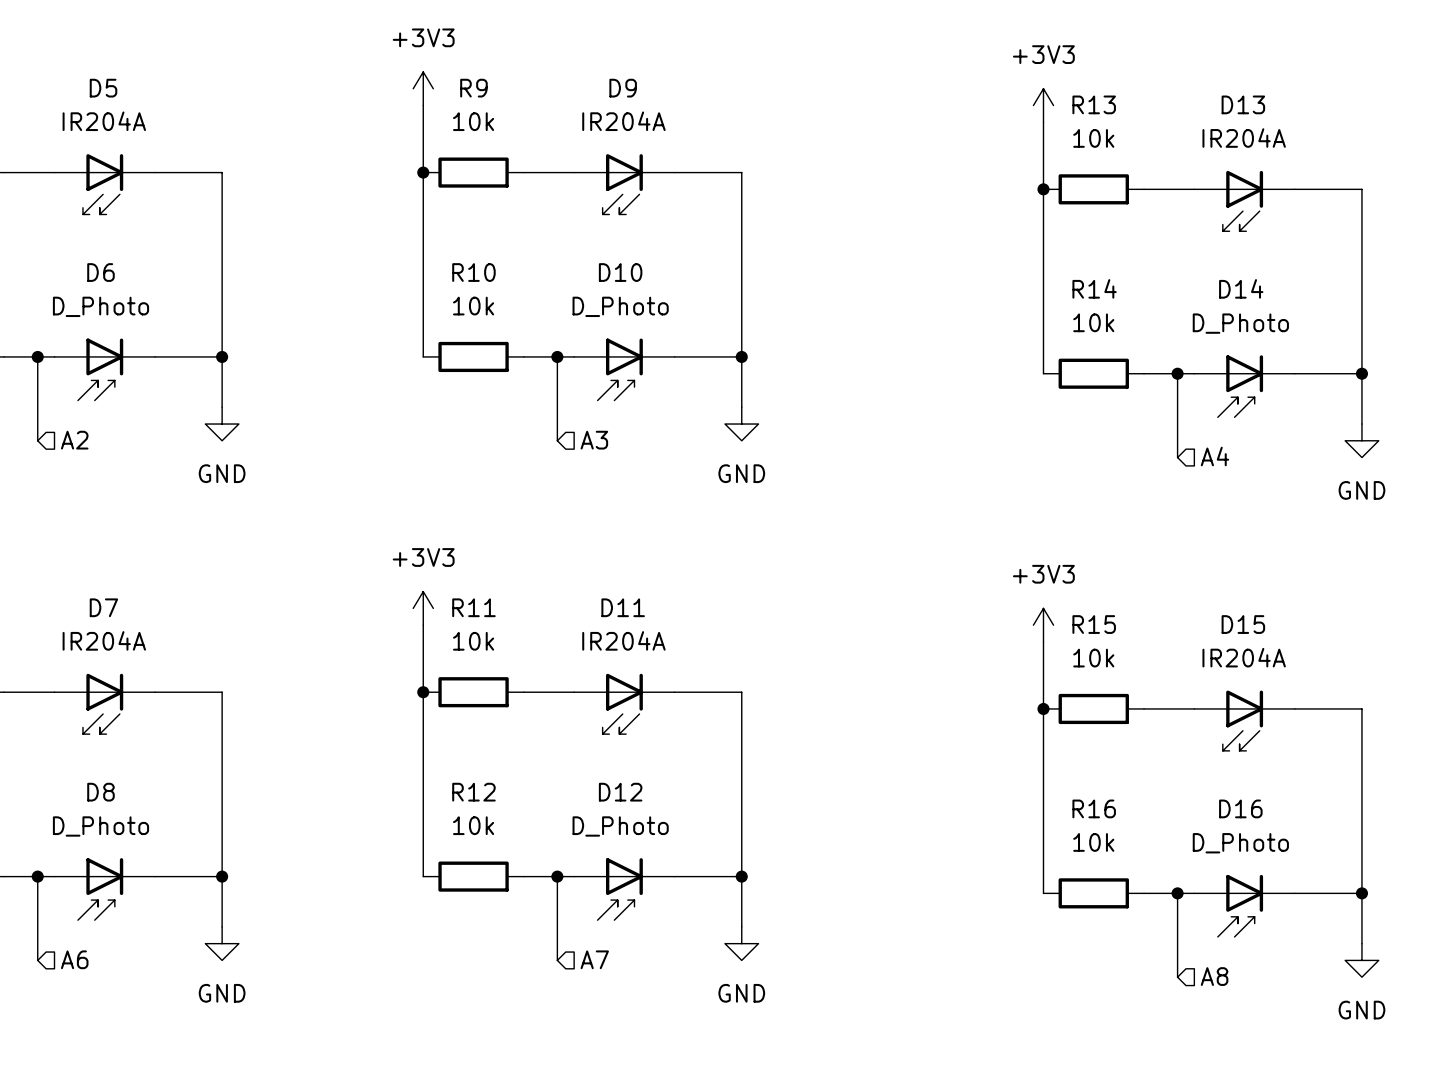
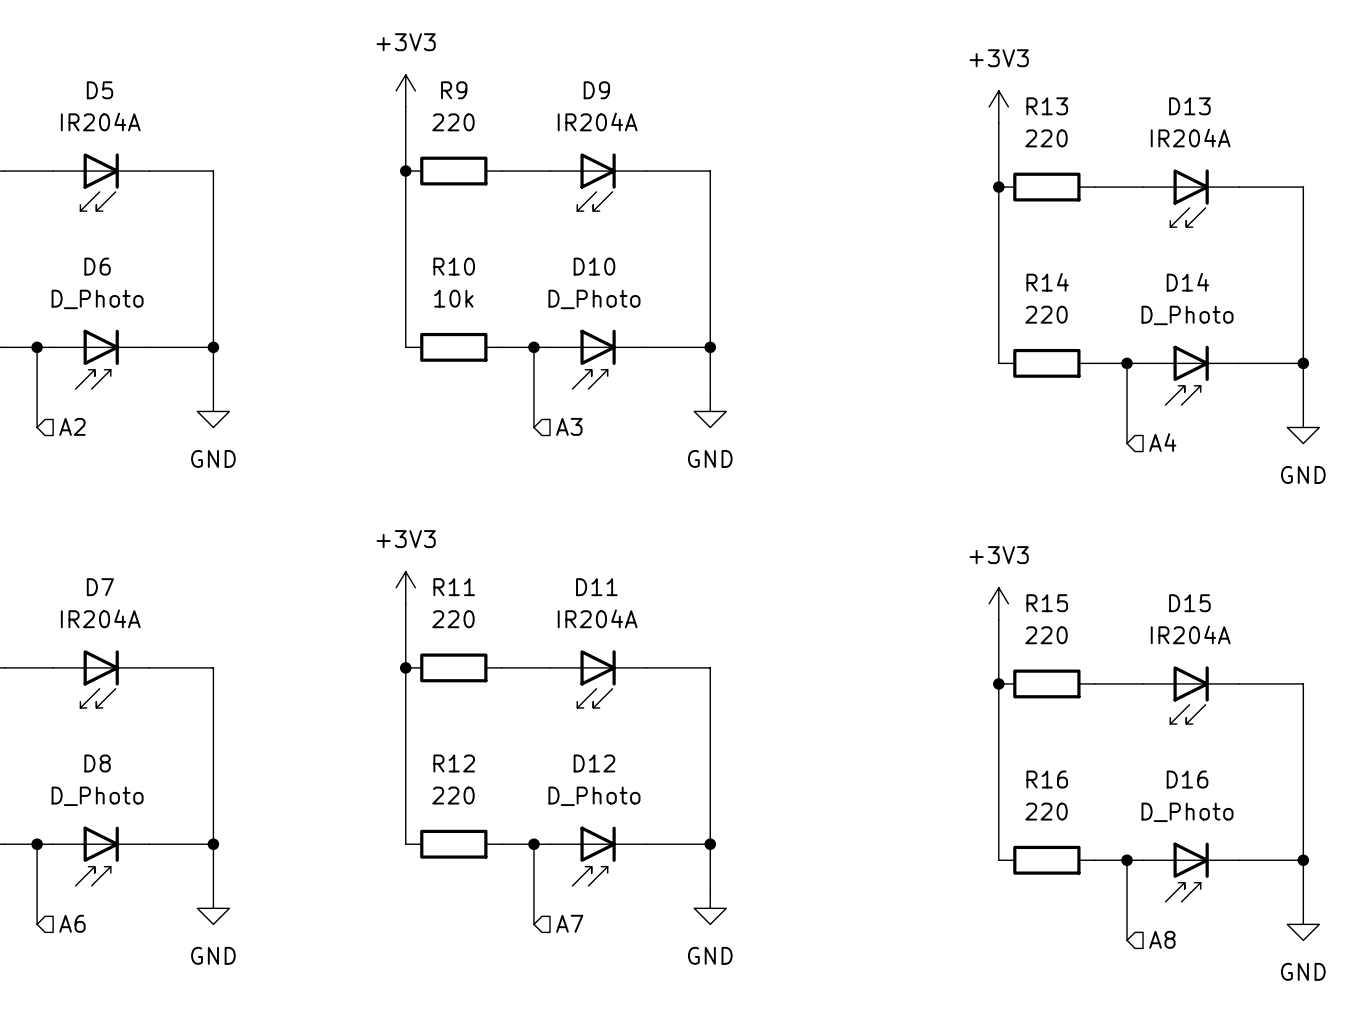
R9 value: 10k (473, 121) -> 220 (453, 122)
R13 value: 10k (1093, 138) -> 220 (1046, 138)
R14 value: 10k (1093, 322) -> 220 (1046, 314)
R11 value: 10k (473, 641) -> 220 (453, 619)
R15 value: 10k (1093, 658) -> 220 (1046, 635)
R12 value: 10k (473, 825) -> 220 (453, 795)
R16 value: 10k (1093, 842) -> 220 (1046, 811)

